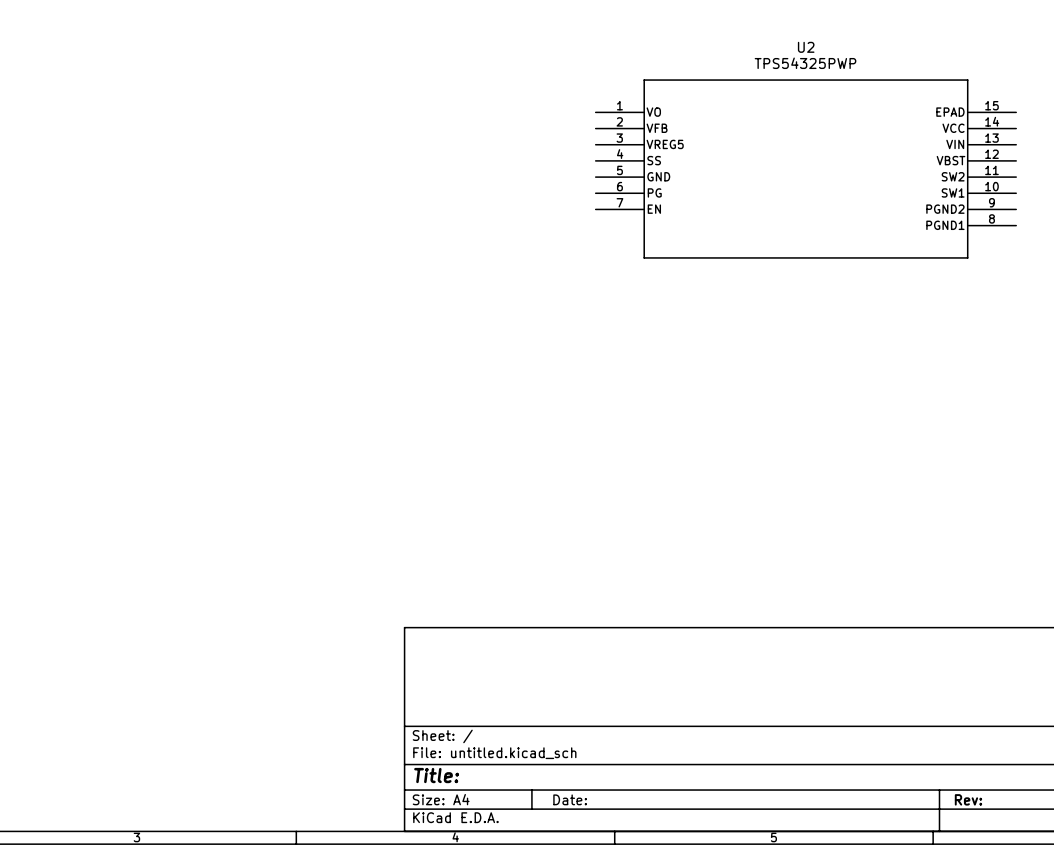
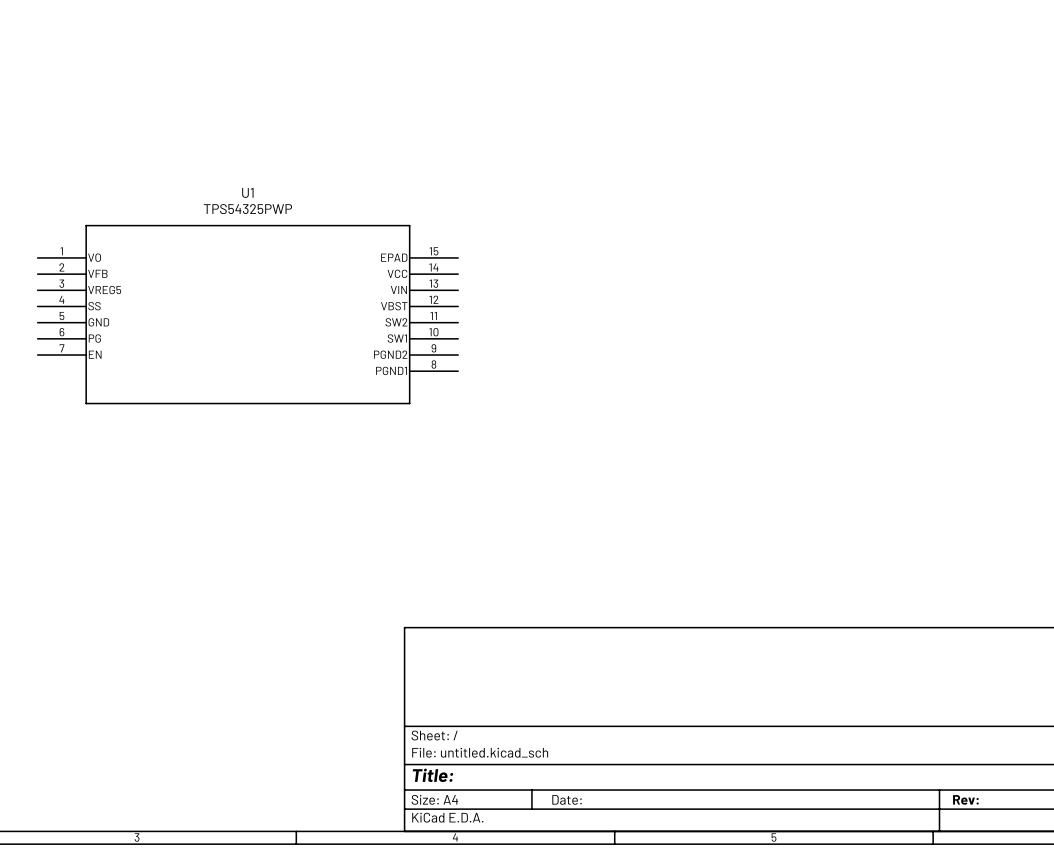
U2: TPS54325PWP (805, 169) -> none
U1: none -> TPS54325PWP (247, 314)

